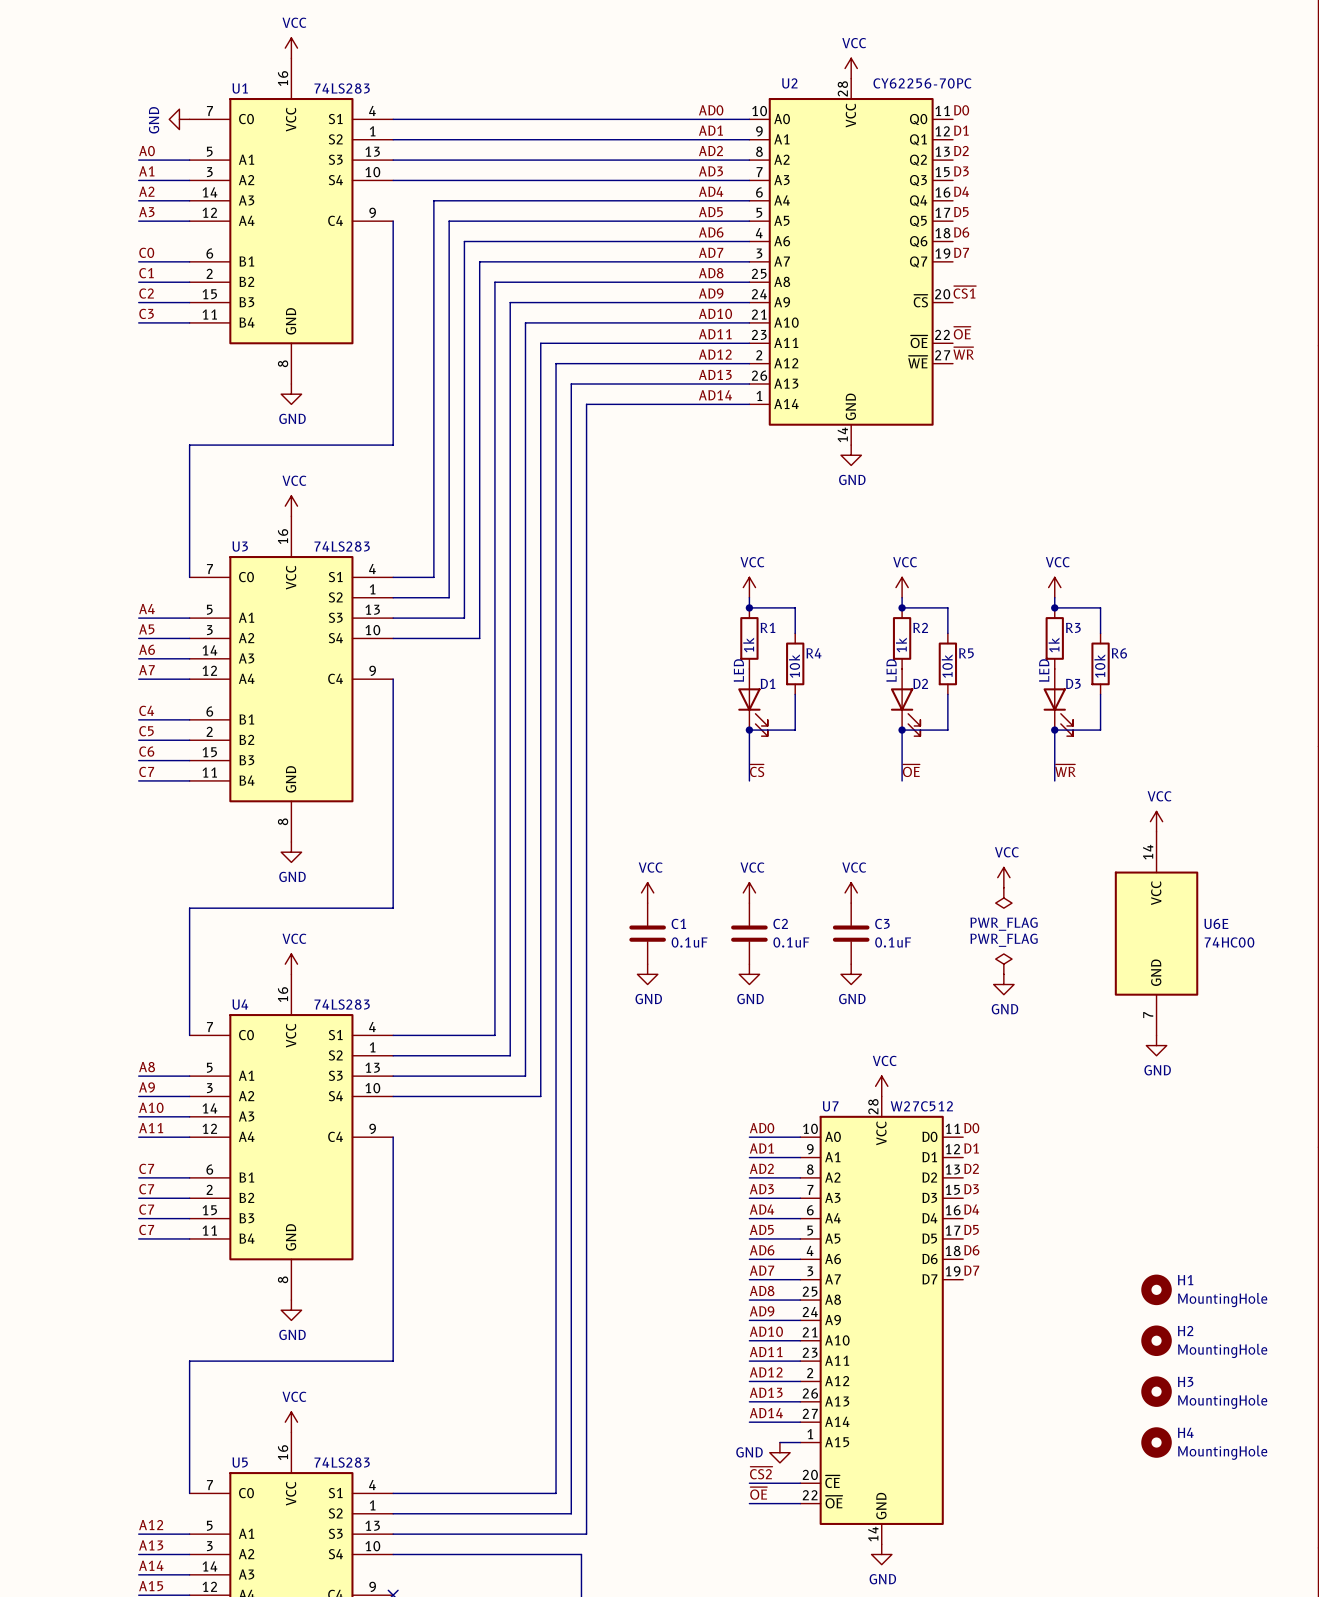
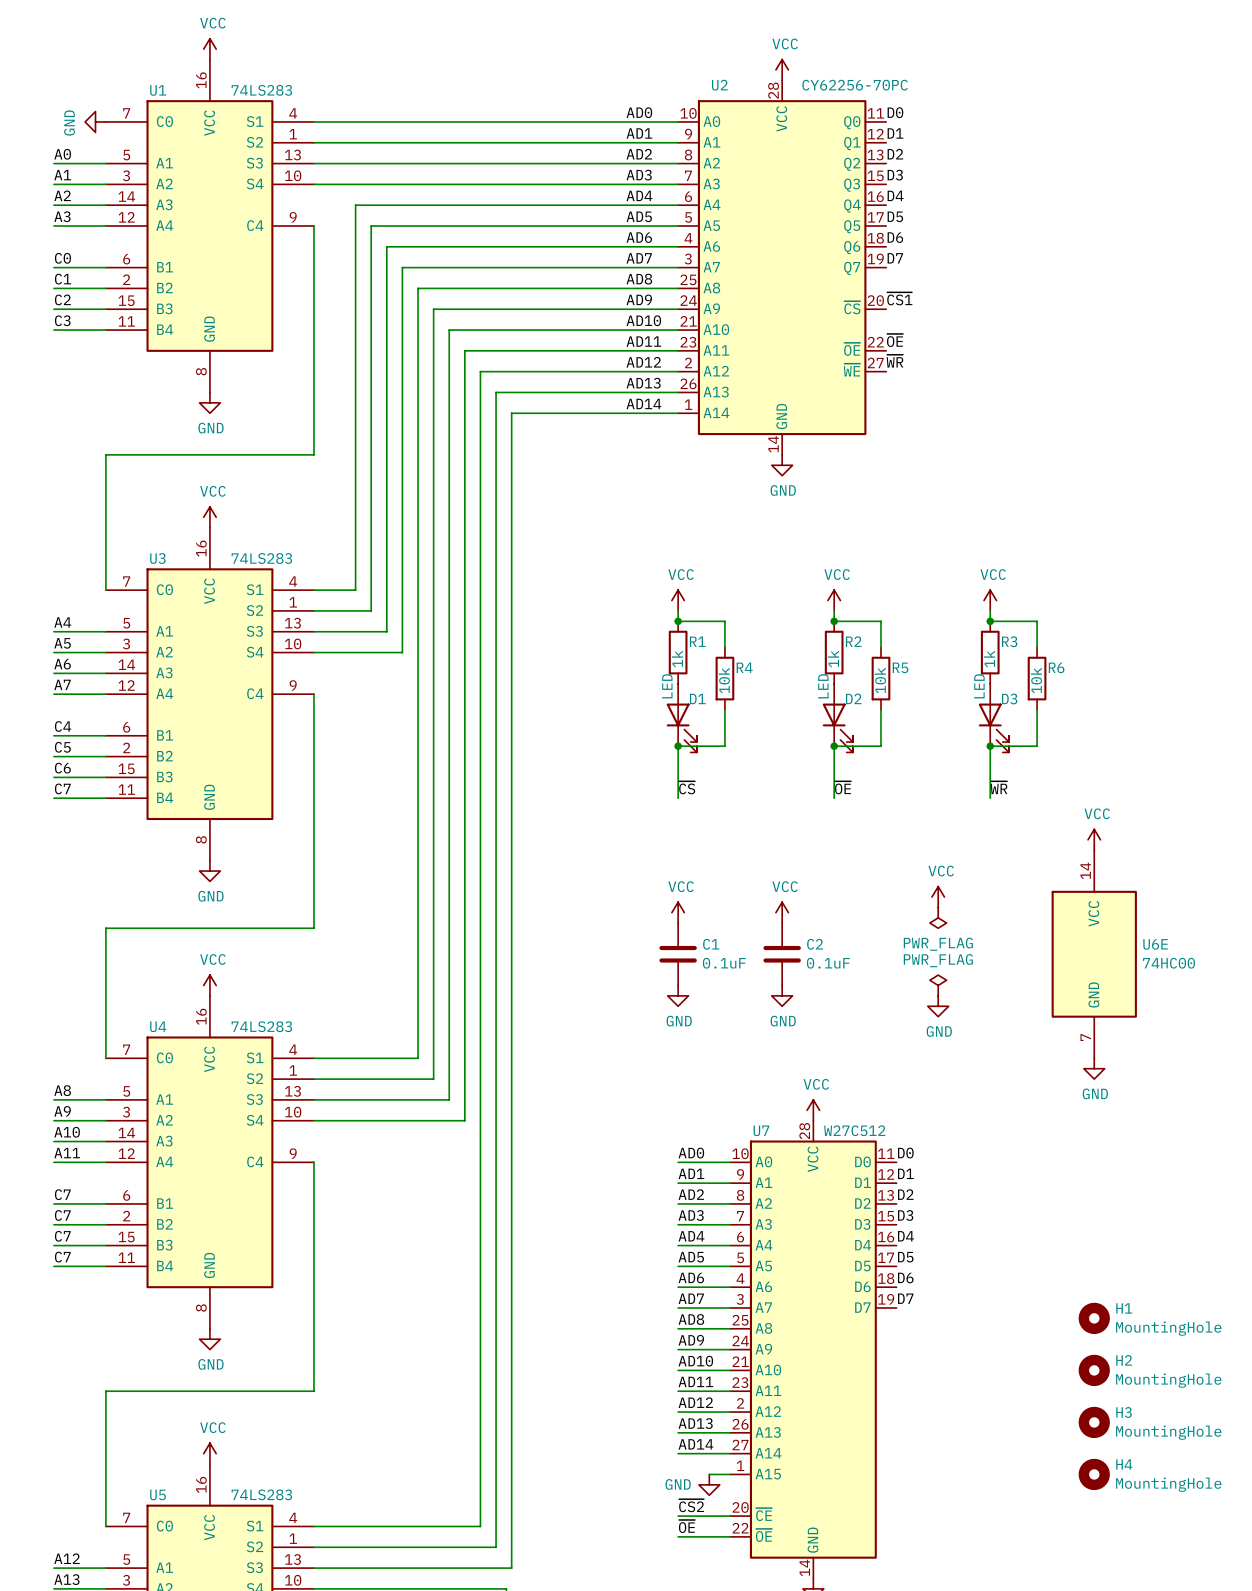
power symbol: VCC (647, 892) -> none
C2 name: C2 (780, 923) -> C1 (711, 944)
C3 name: C3 (882, 923) -> C2 (815, 944)
C1: 0.1uF (647, 933) -> none
power symbol: GND (647, 974) -> none

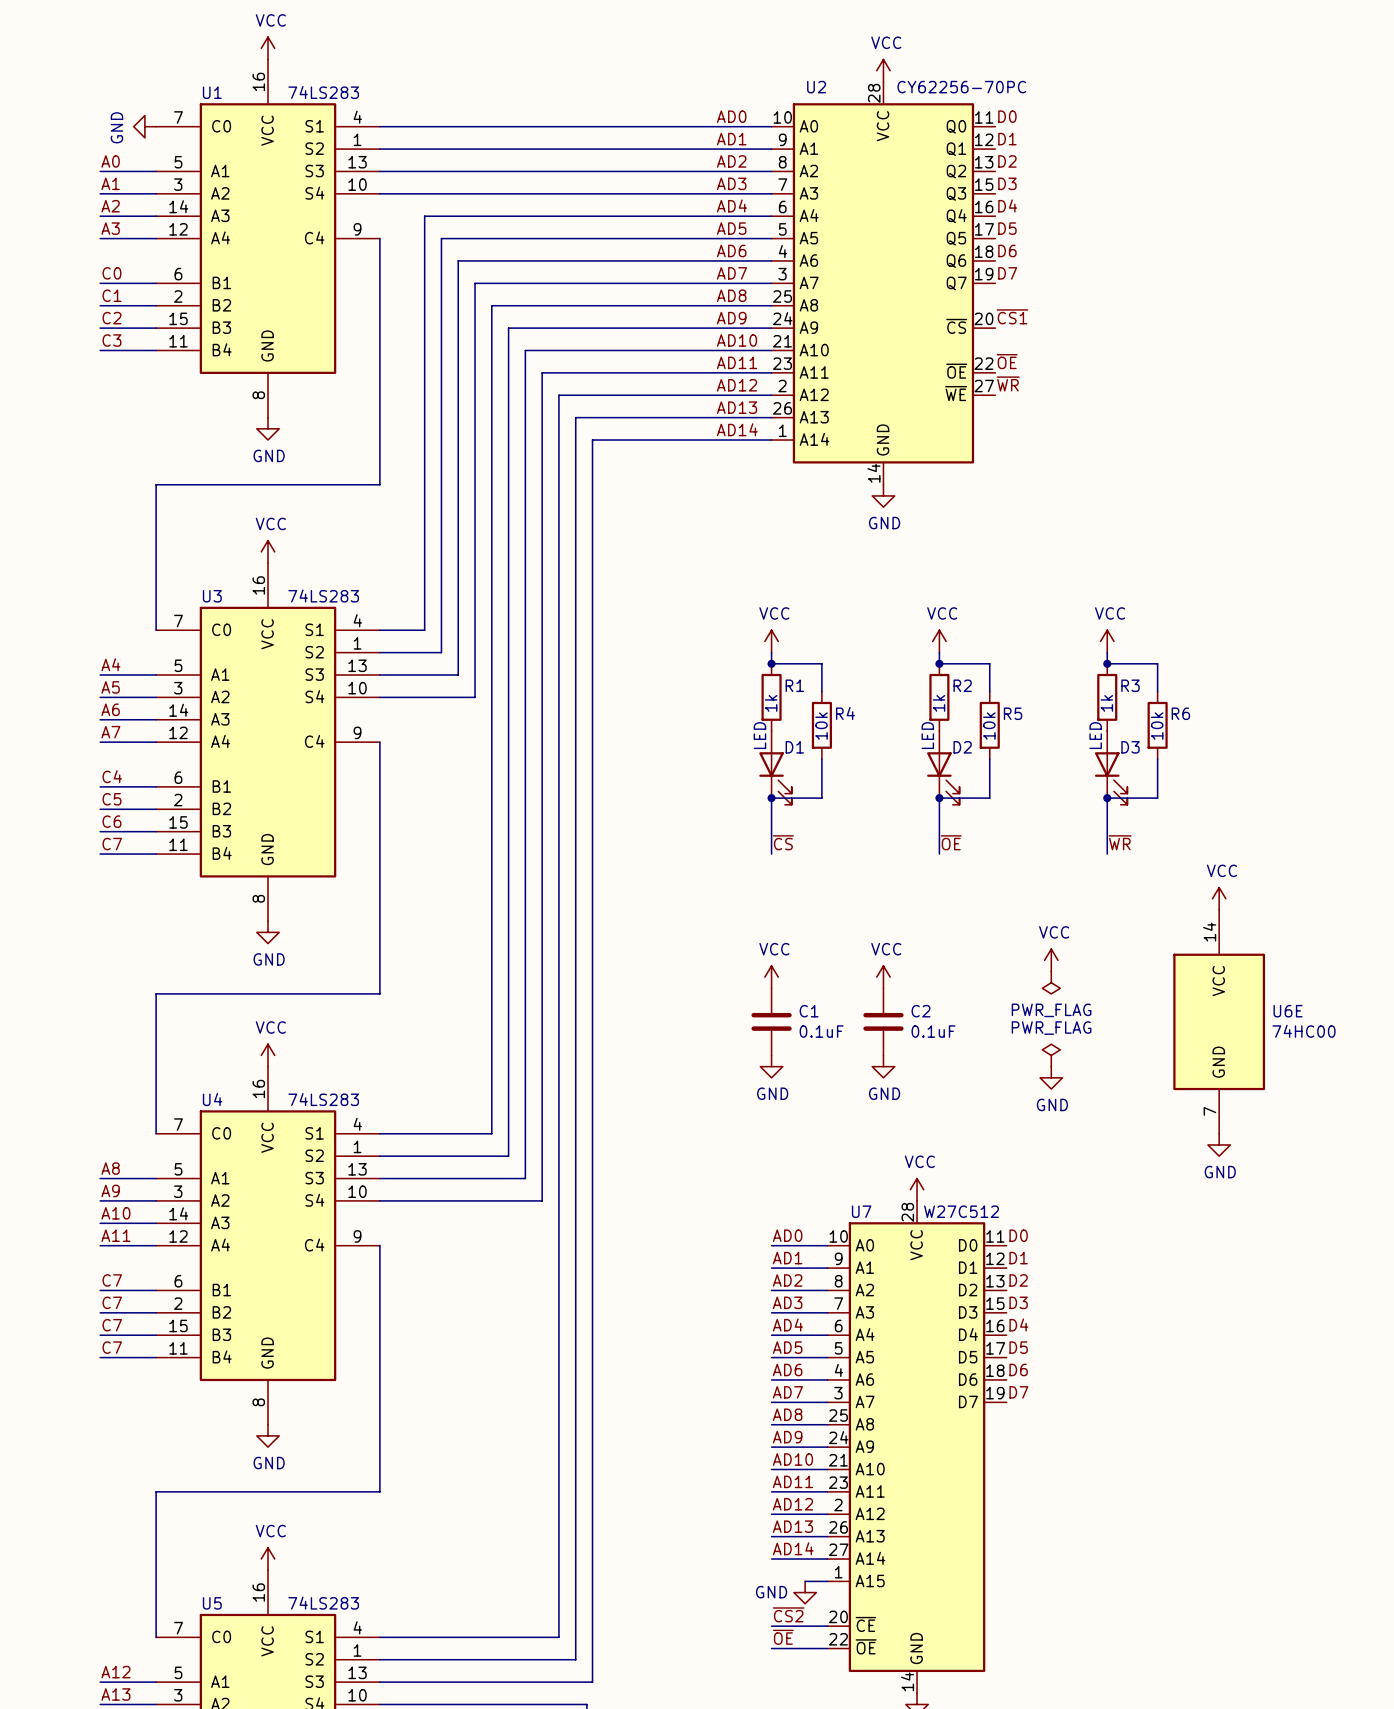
H1: MountingHole (1094, 1318) -> none
H2: MountingHole (1094, 1370) -> none
H3: MountingHole (1094, 1422) -> none
H4: MountingHole (1094, 1474) -> none

